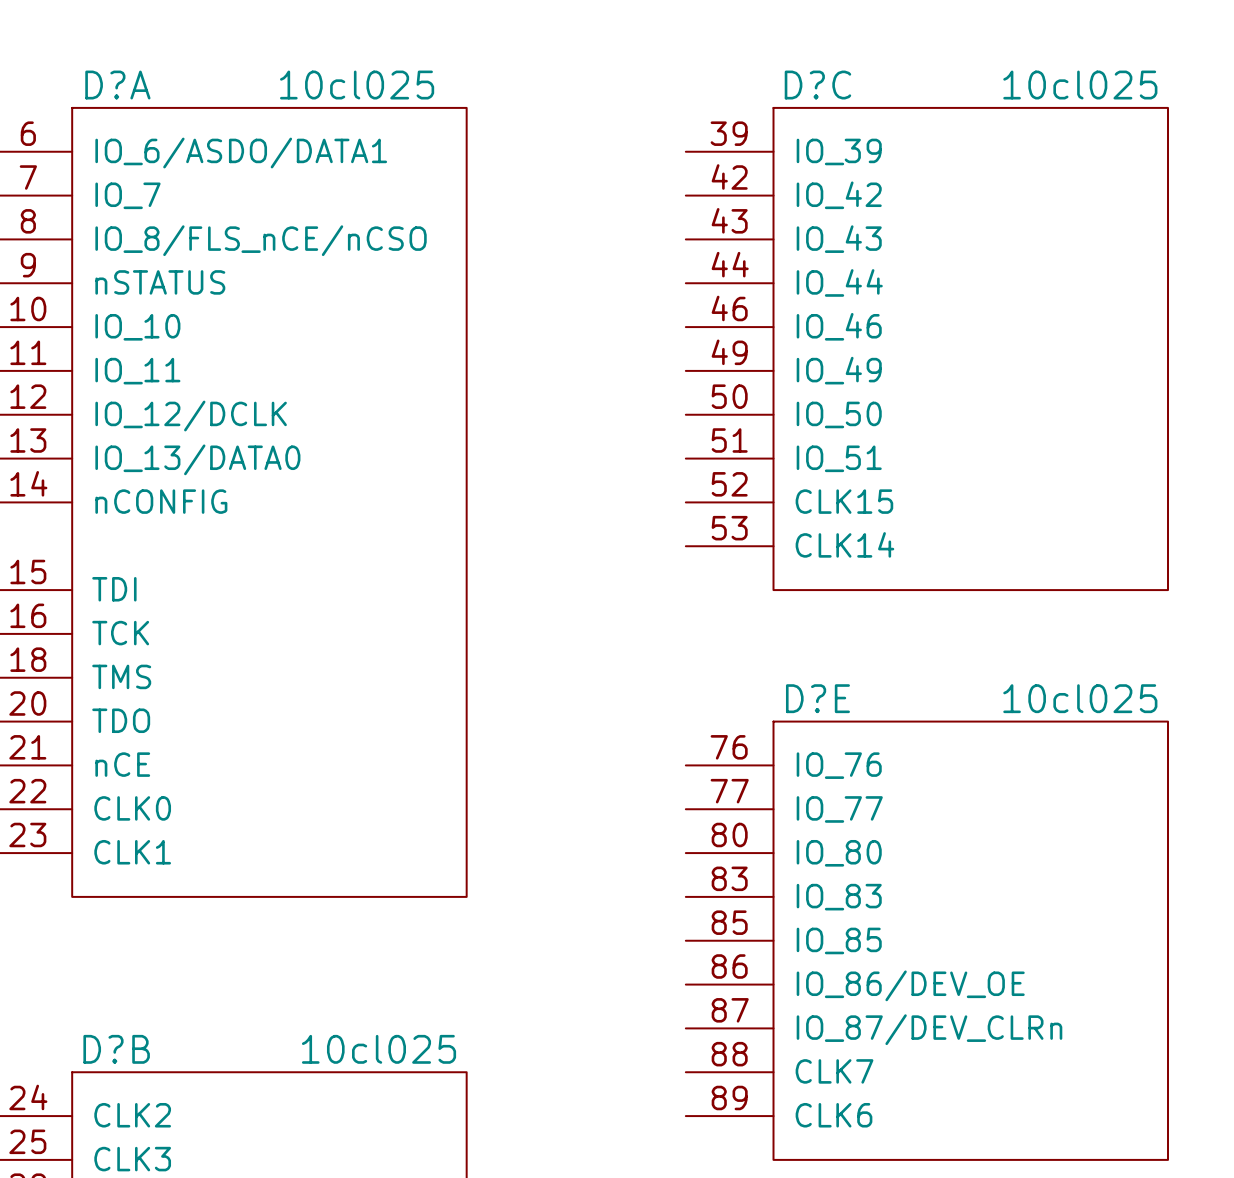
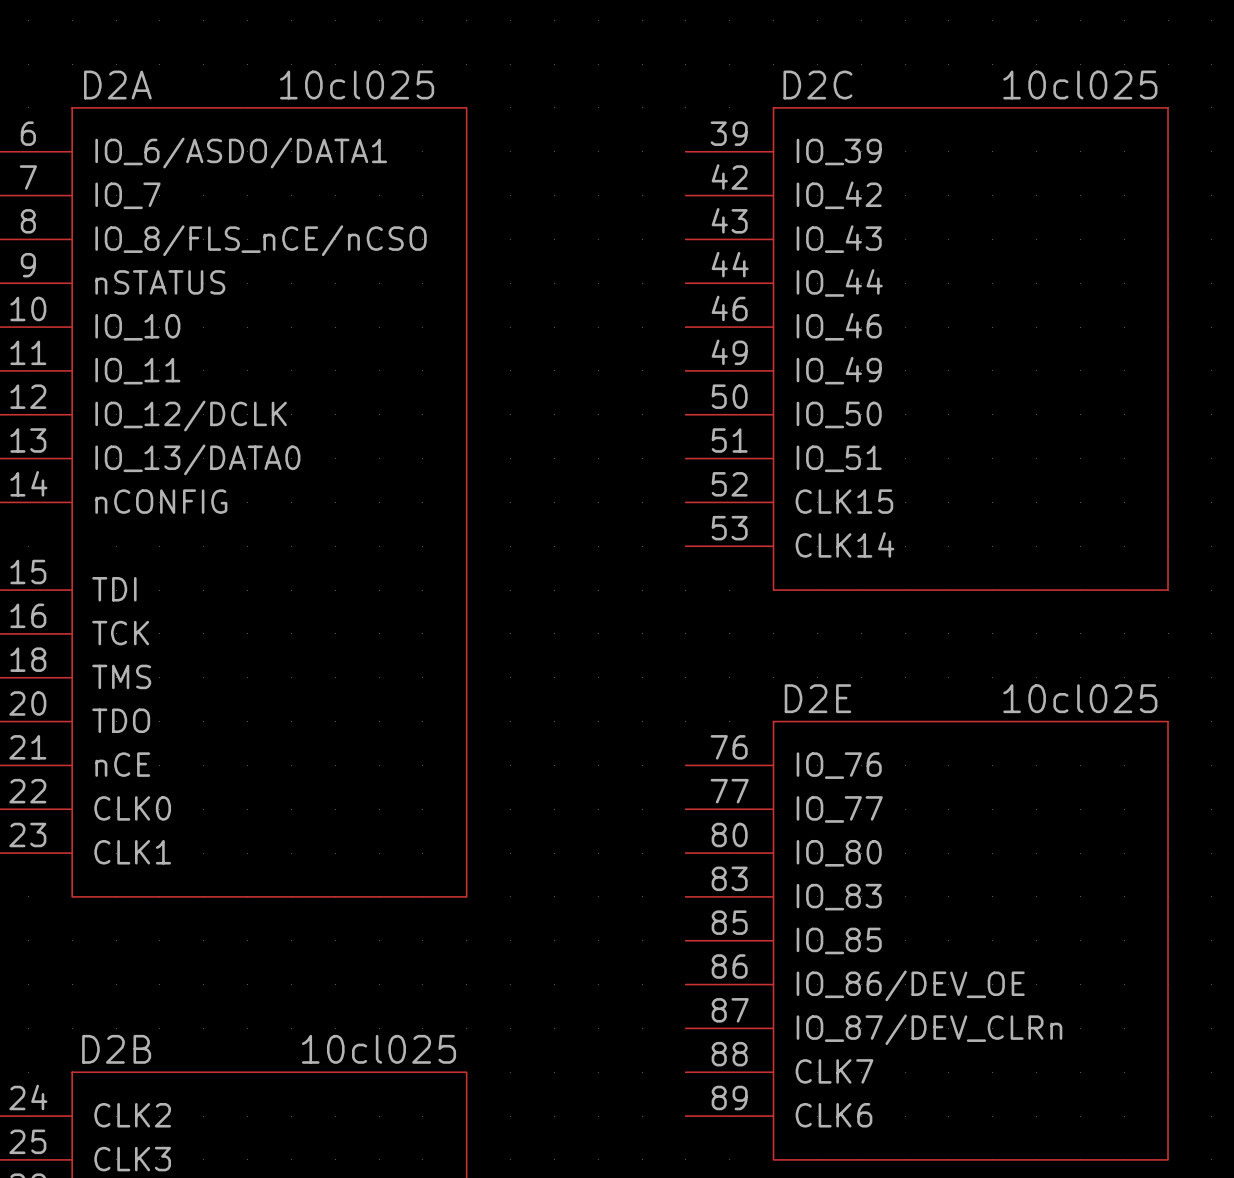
D?A name: D?A (117, 85) -> D2A (117, 85)
D?C name: D?C (817, 85) -> D2C (817, 85)
D?E name: D?E (817, 698) -> D2E (817, 698)
D?B name: D?B (116, 1049) -> D2B (116, 1049)

